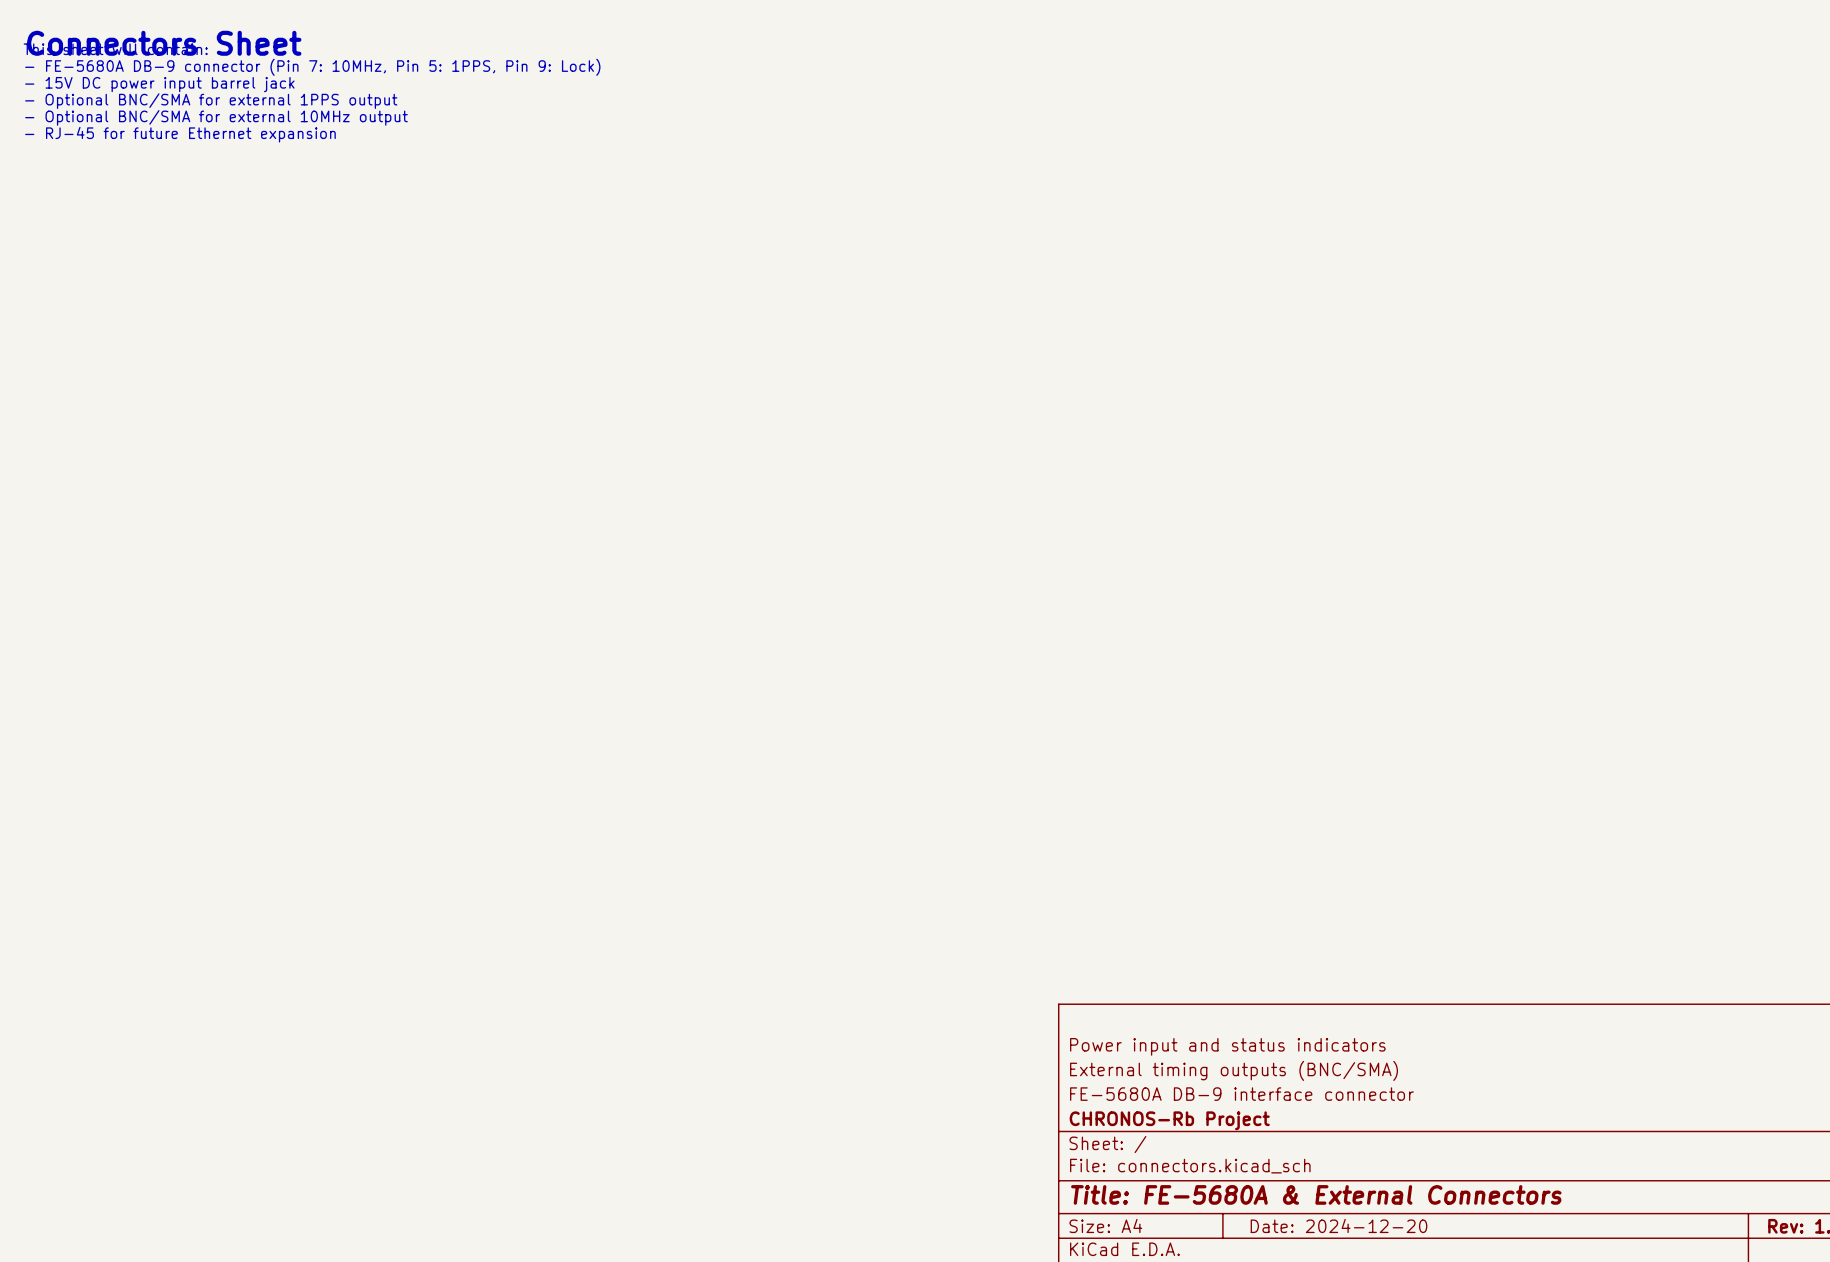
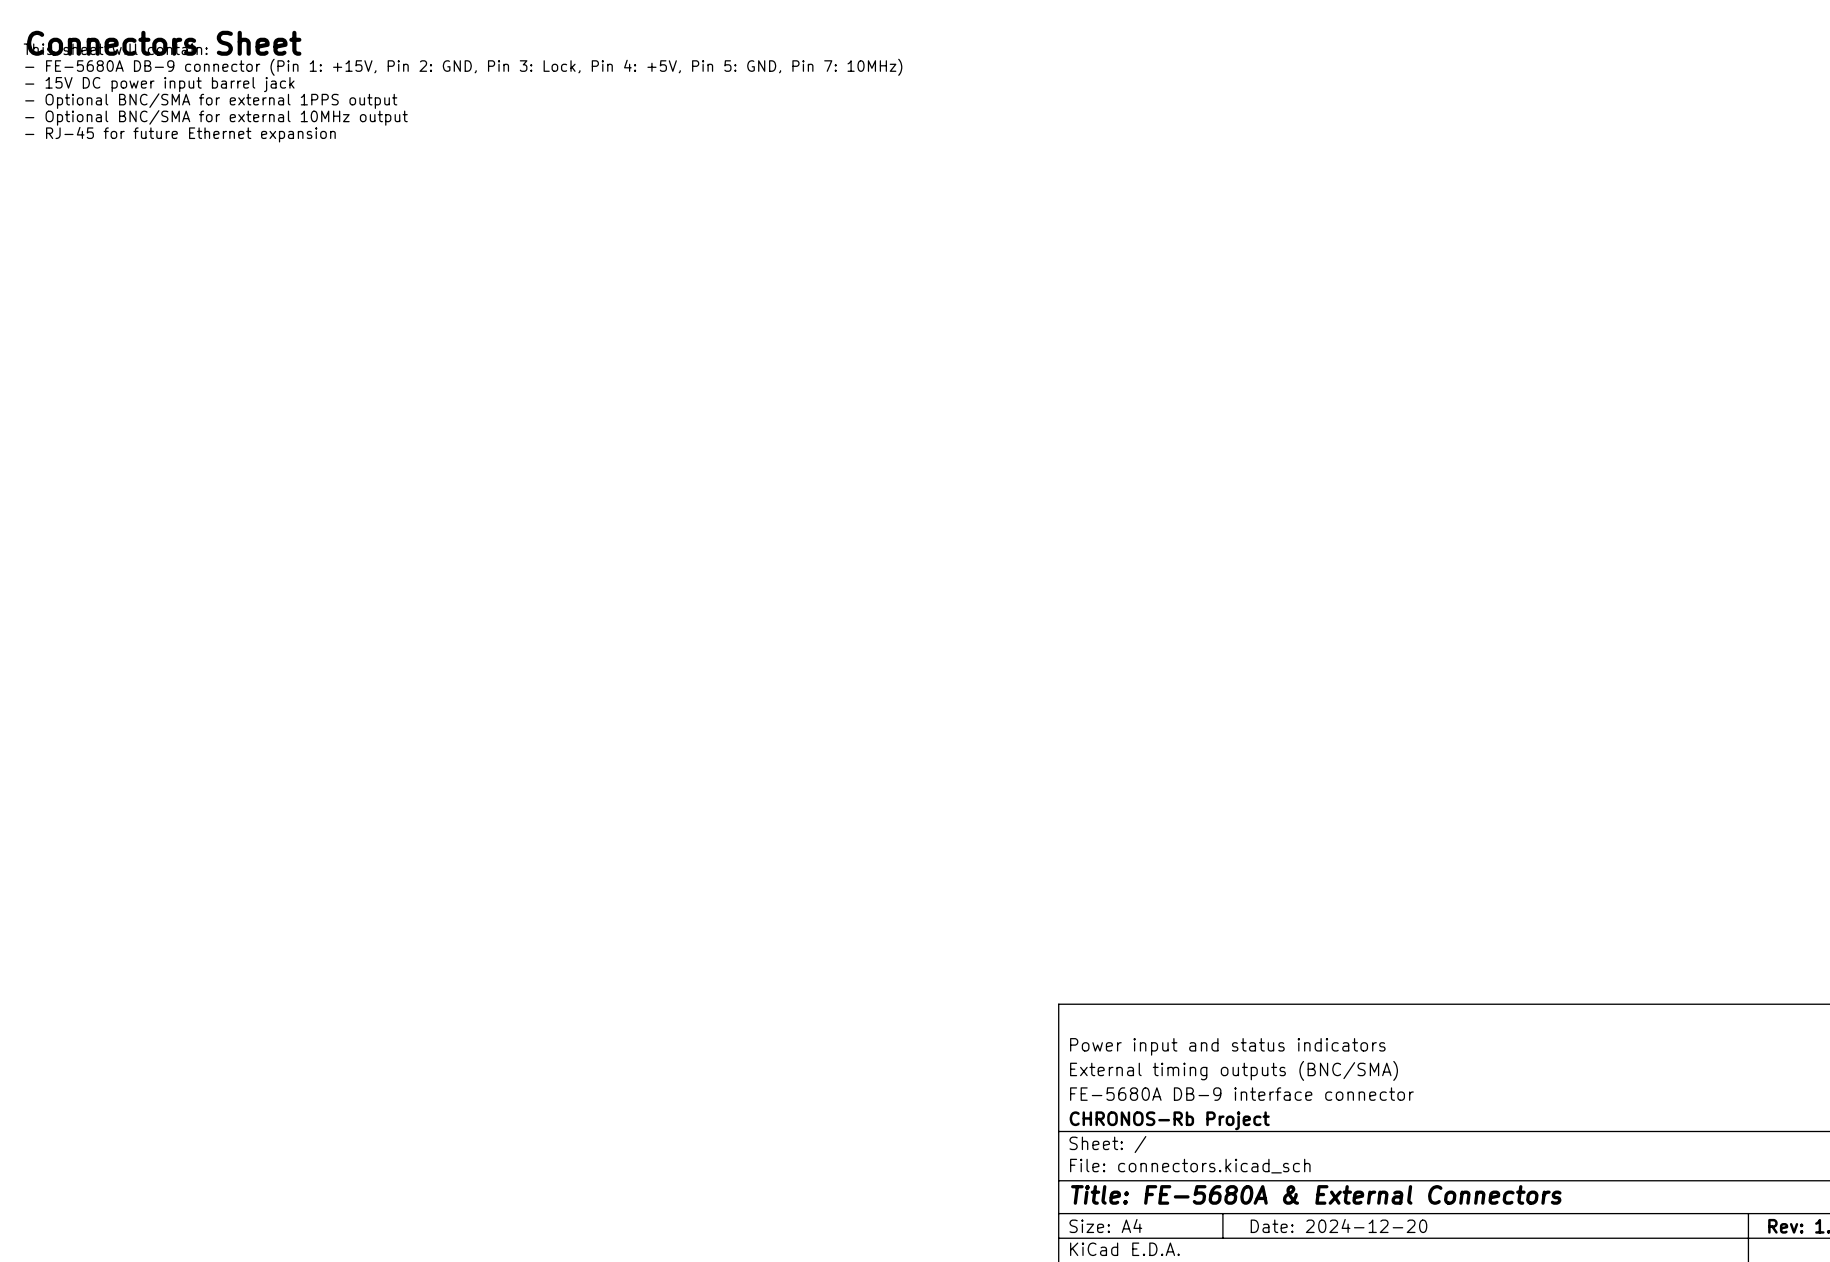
text: - FE-5680A DB-9 connector (Pin 7: 10MHz, Pin 5: 1PPS, Pin 9: Lock) (312, 67) -> - FE-5680A DB-9 connector (Pin 1: +15V, Pin 2: GND, Pin 3: Lock, Pin 4: +5V, Pin 5: GND, Pin 7: 10MHz) (463, 67)

